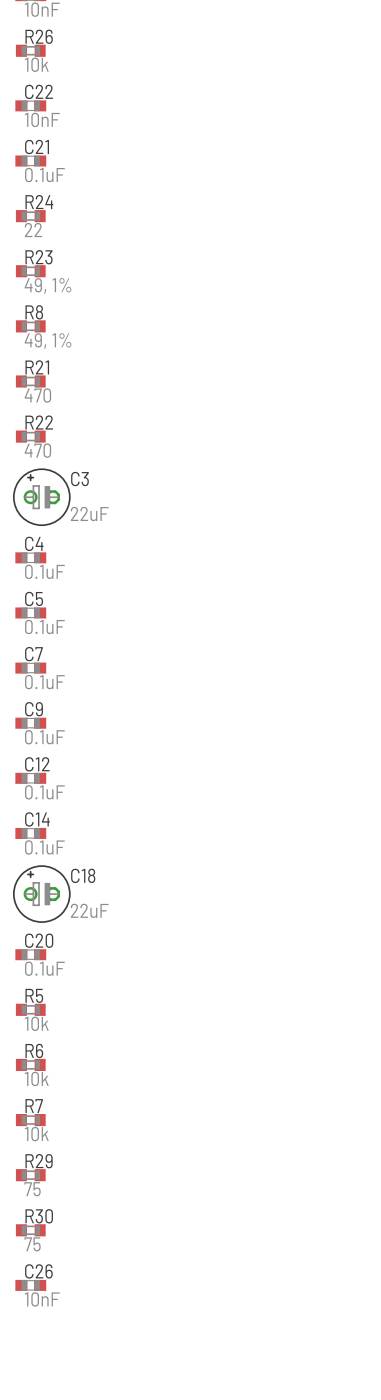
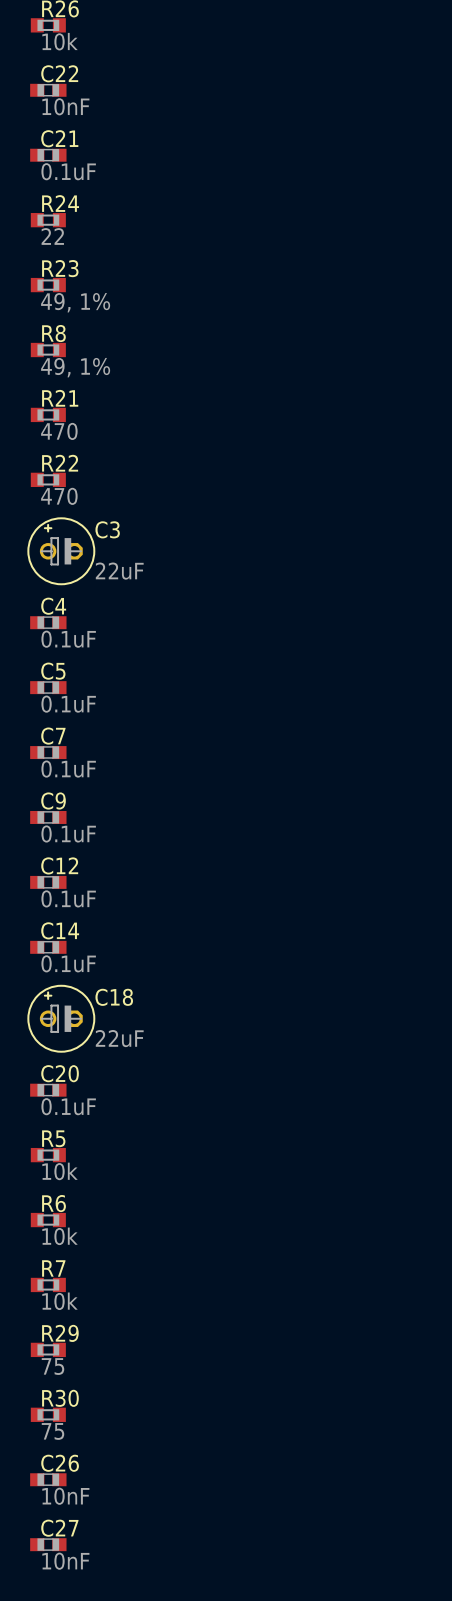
C27: none -> 10nF (48, 1544)

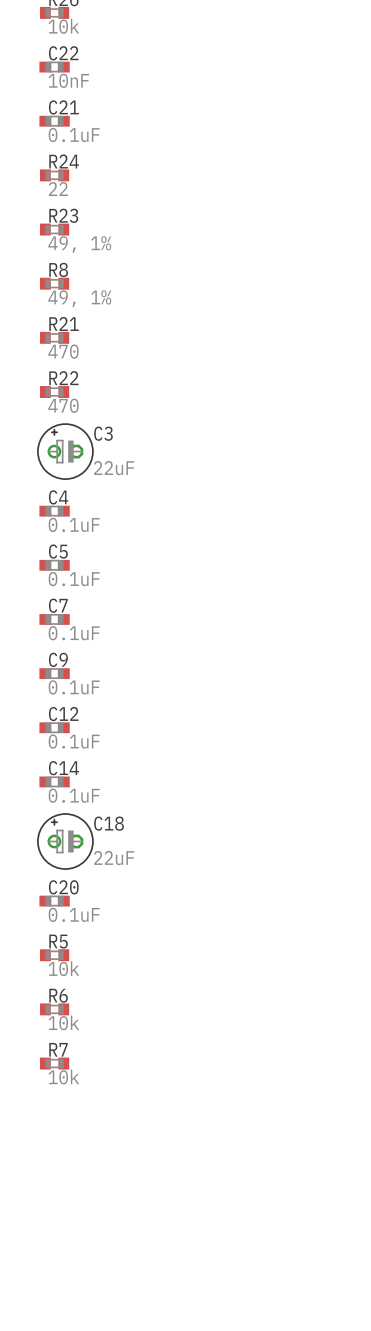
R29: 75 (48, 1349) -> none
R30: 75 (48, 1414) -> none
C26: 10nF (48, 1479) -> none
C27: 10nF (48, 1544) -> none

